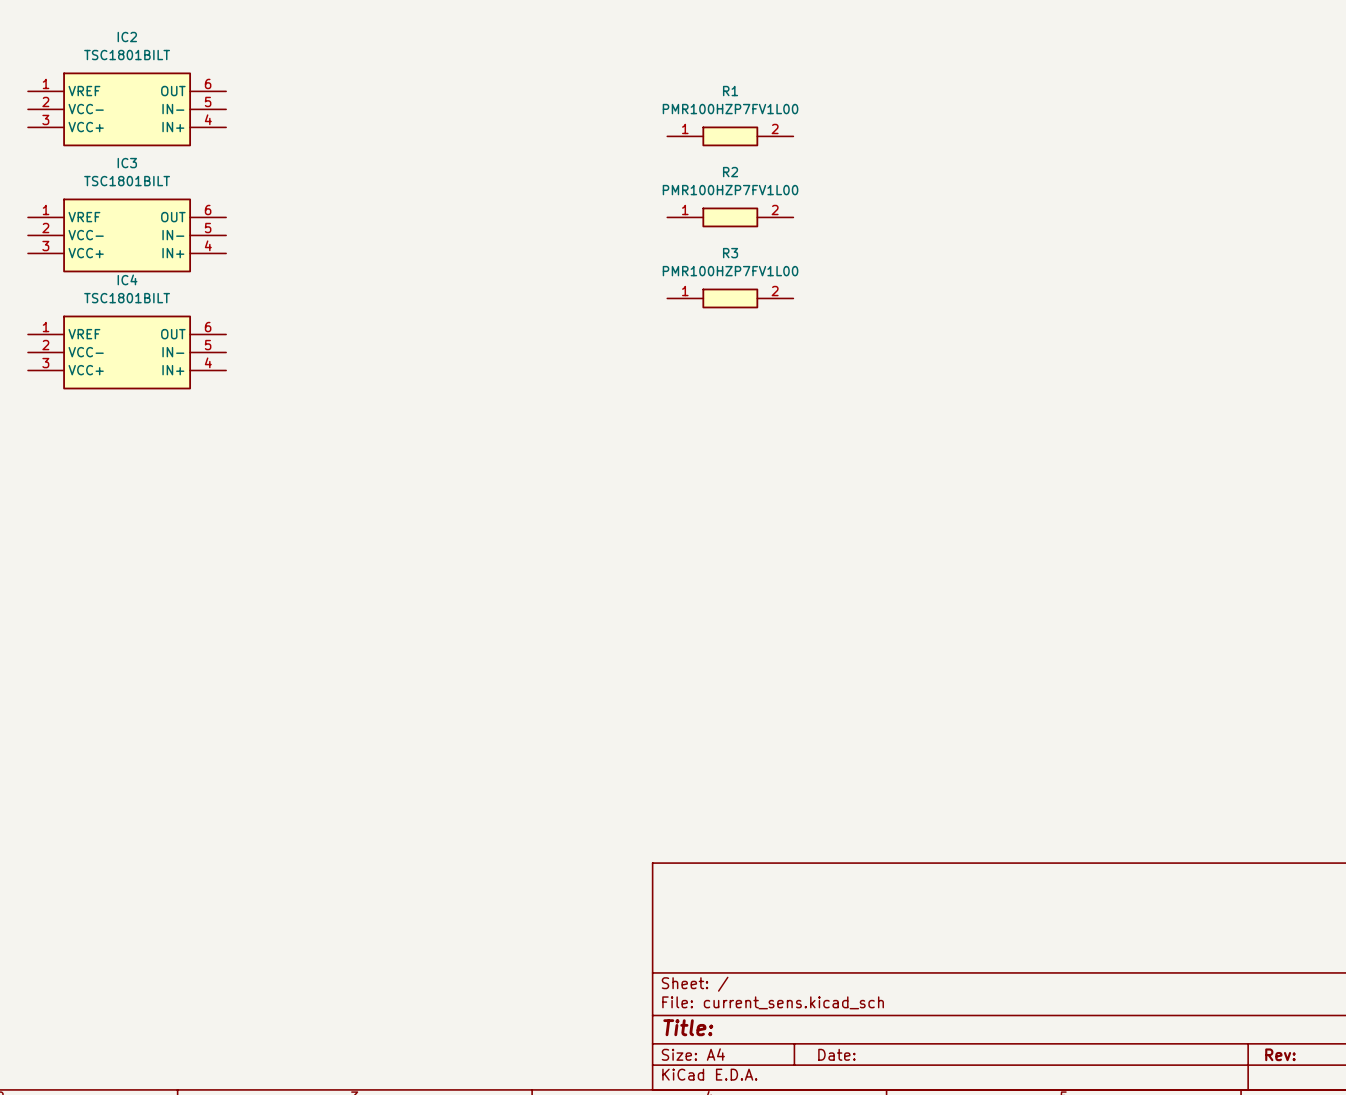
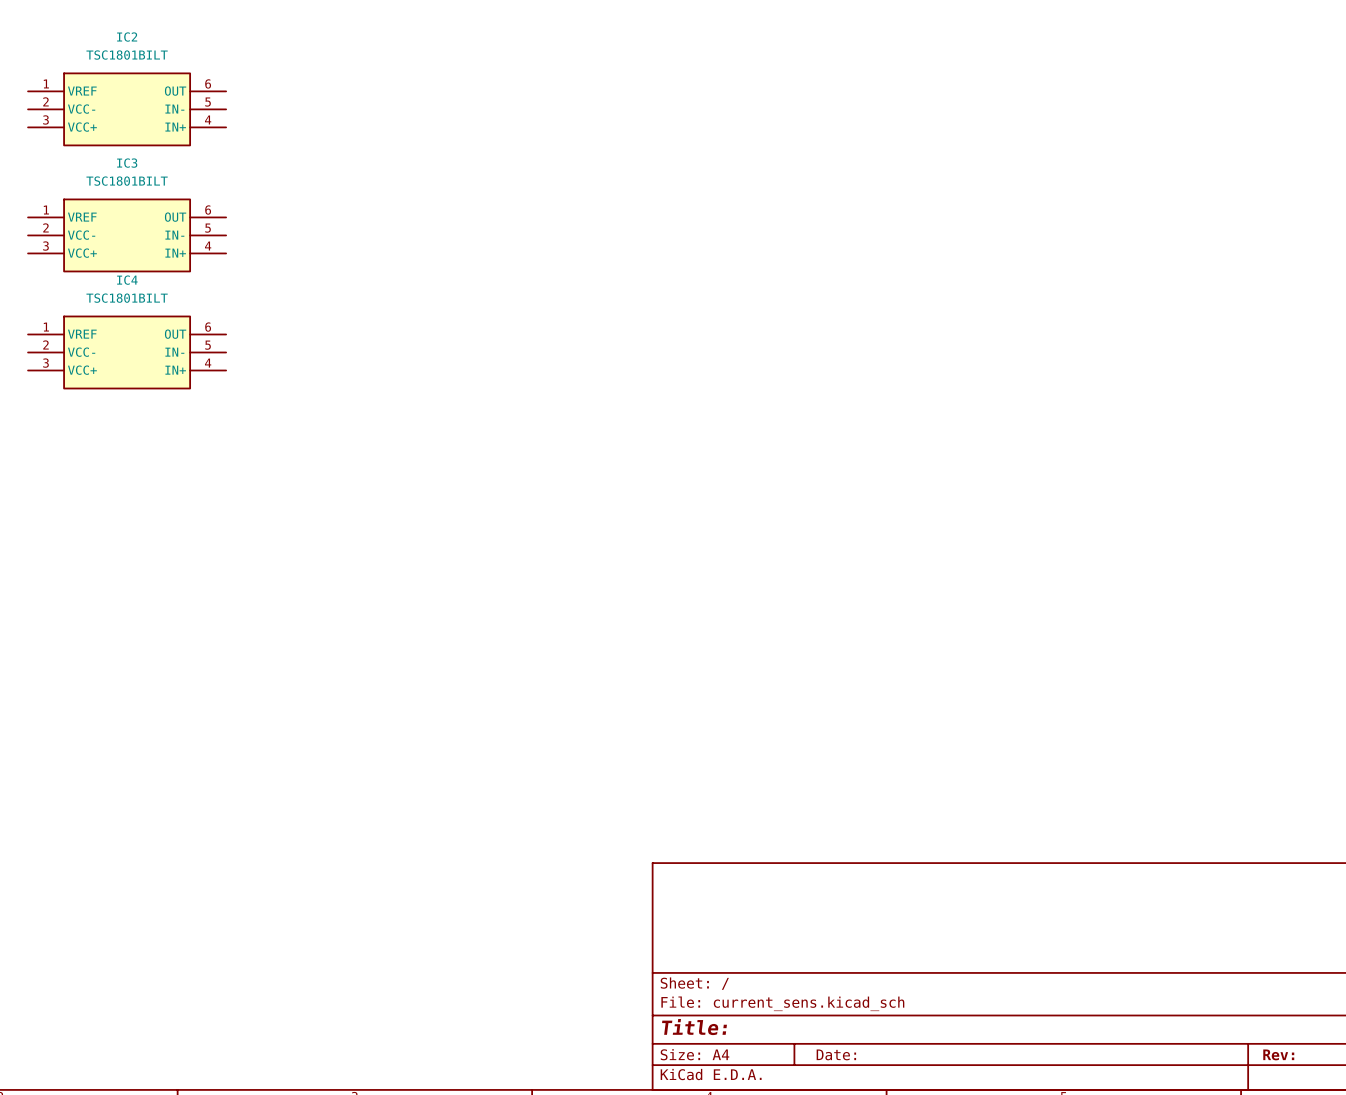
R1: PMR100HZP7FV1L00 (730, 136) -> none
R2: PMR100HZP7FV1L00 (730, 217) -> none
R3: PMR100HZP7FV1L00 (730, 298) -> none

